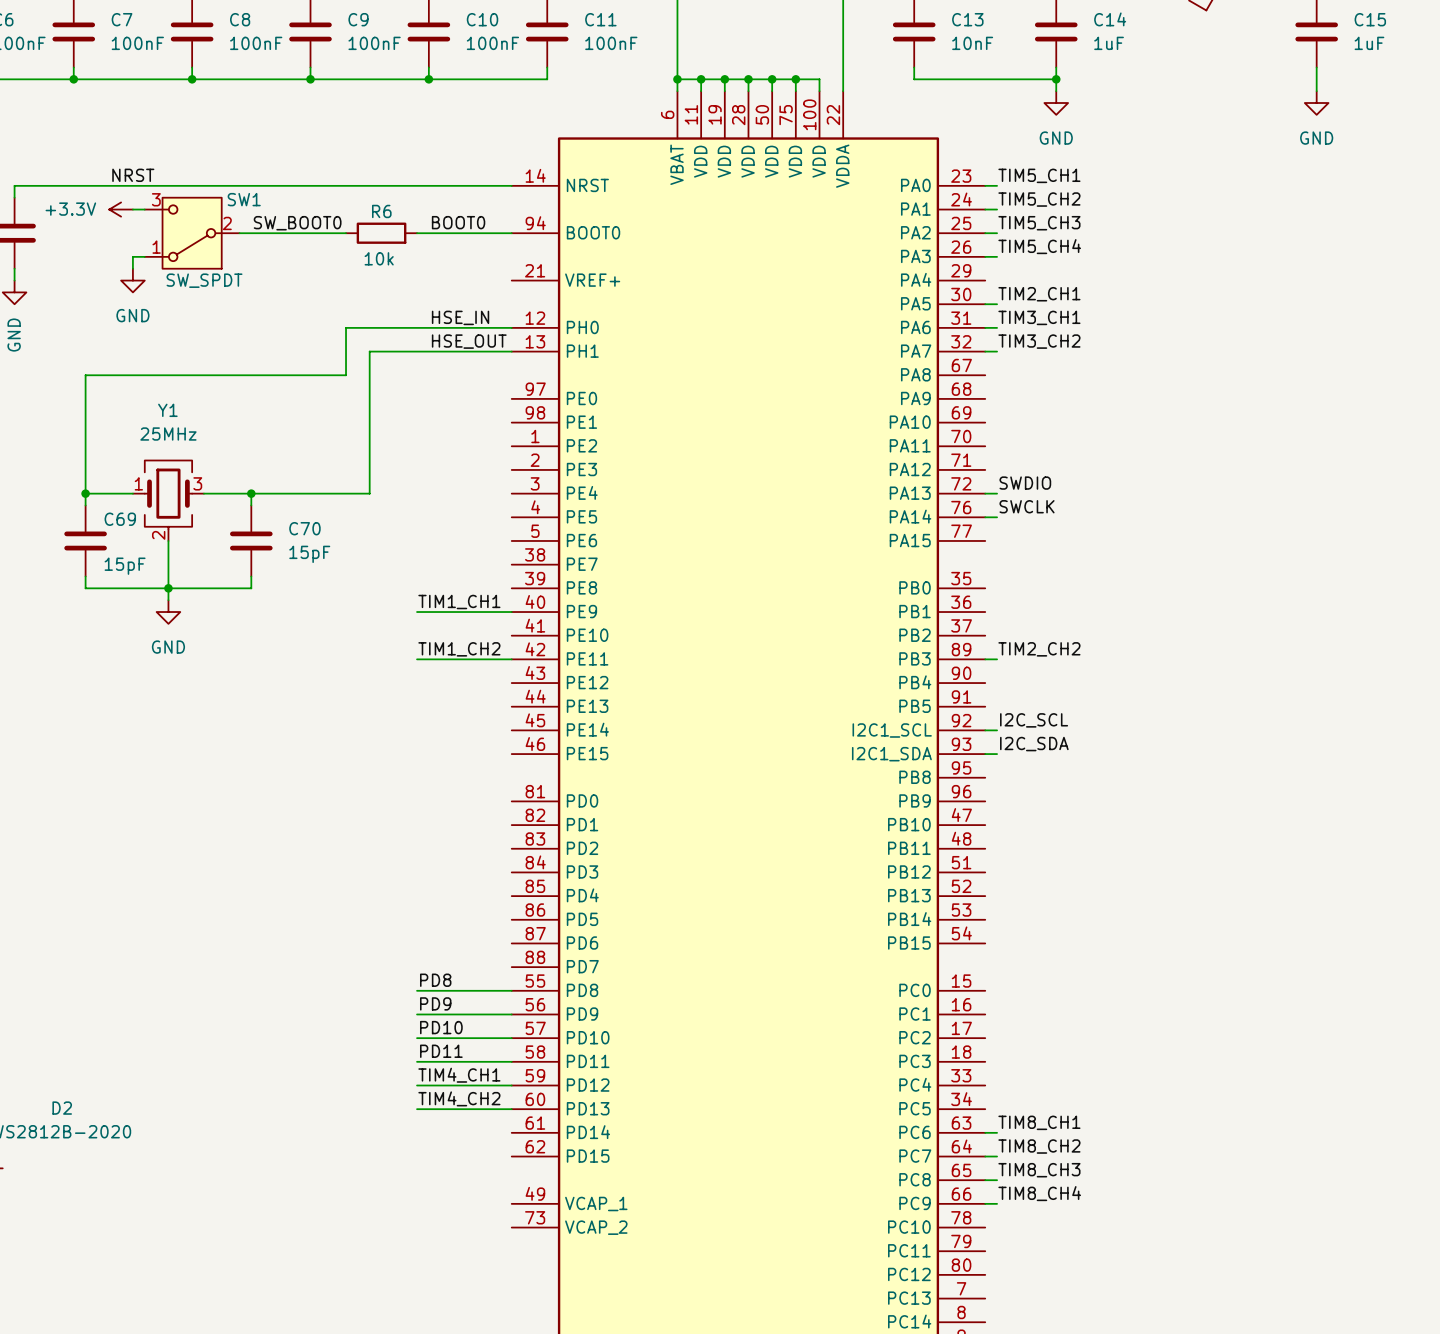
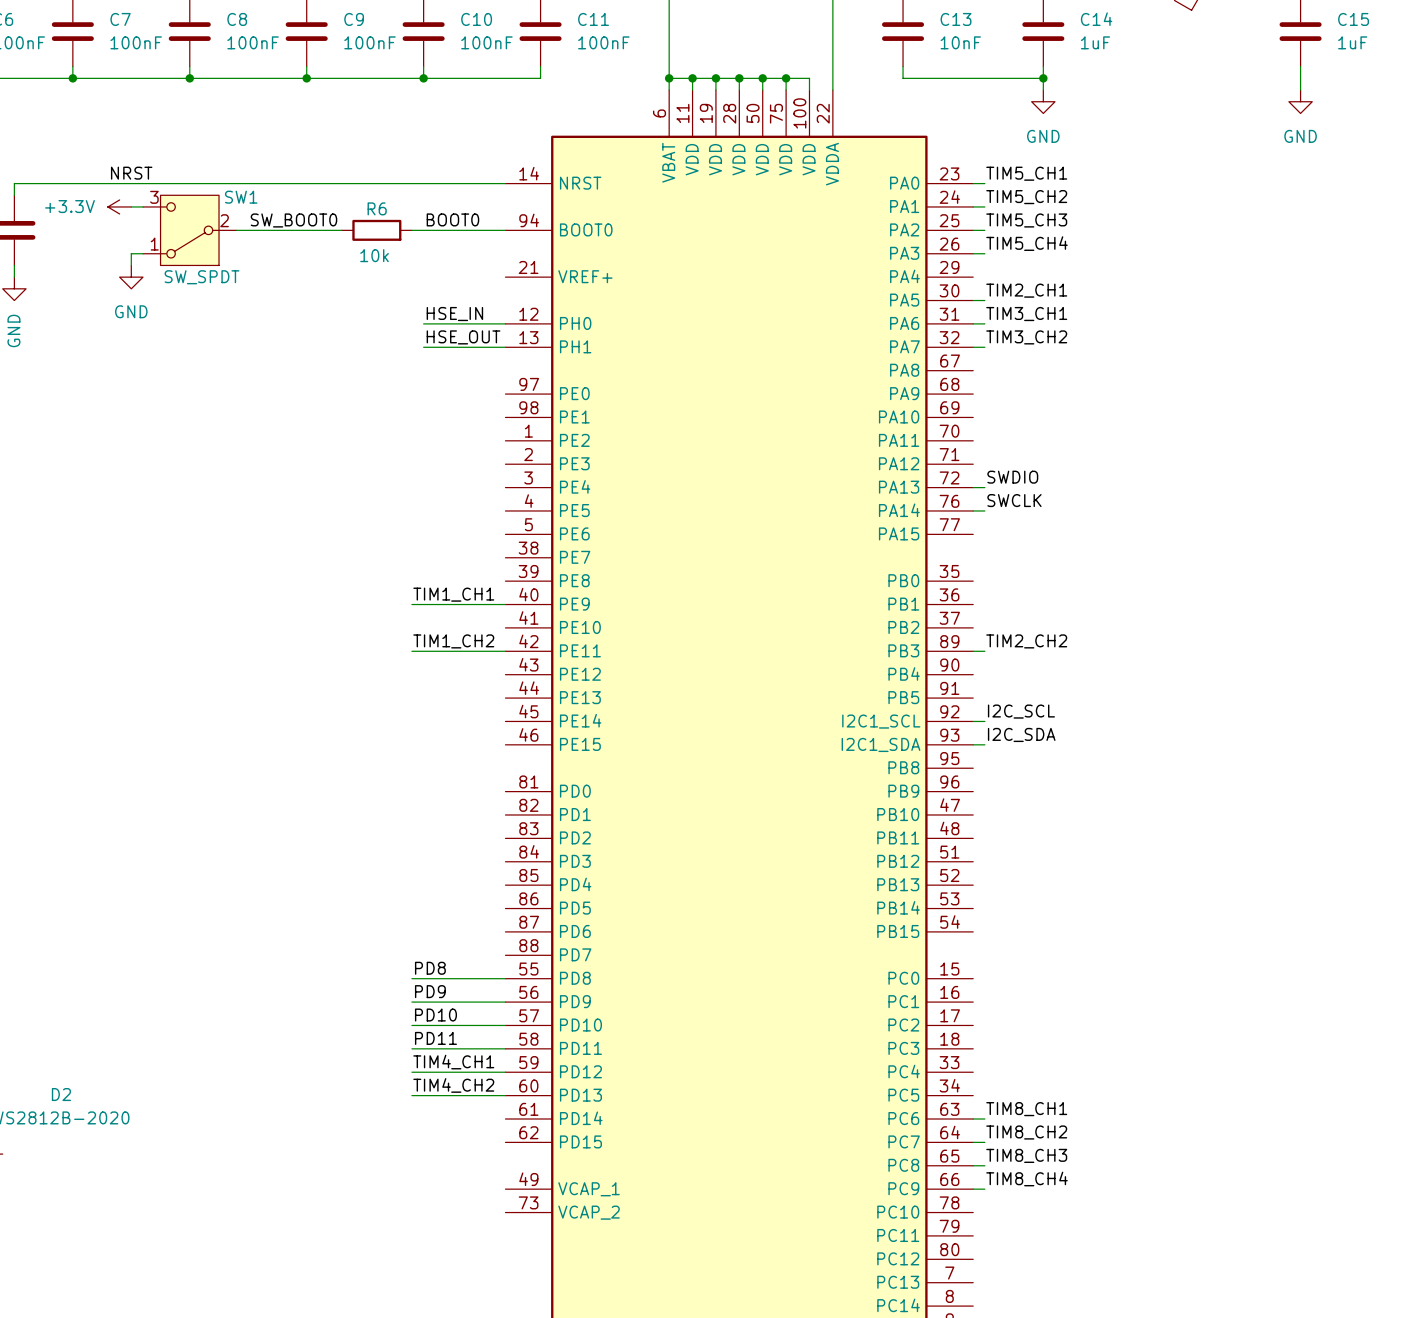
wire: (428, 327) (346, 327) (346, 375) (85, 375) (85, 505) -> none
wire: (428, 351) (369, 351) (369, 493) (203, 493) -> none
wire: (85, 493) (132, 493) -> none
junction: (85, 493) -> none
wire: (251, 493) (251, 505) -> none
junction: (251, 493) -> none
Y1: 25MHz (168, 500) -> none
C69: 15pF (85, 540) -> none
wire: (168, 540) (168, 600) -> none
C70: 15pF (251, 540) -> none
wire: (85, 576) (85, 588) (251, 588) (251, 576) -> none
junction: (168, 588) -> none
power symbol: GND (168, 612) -> none

